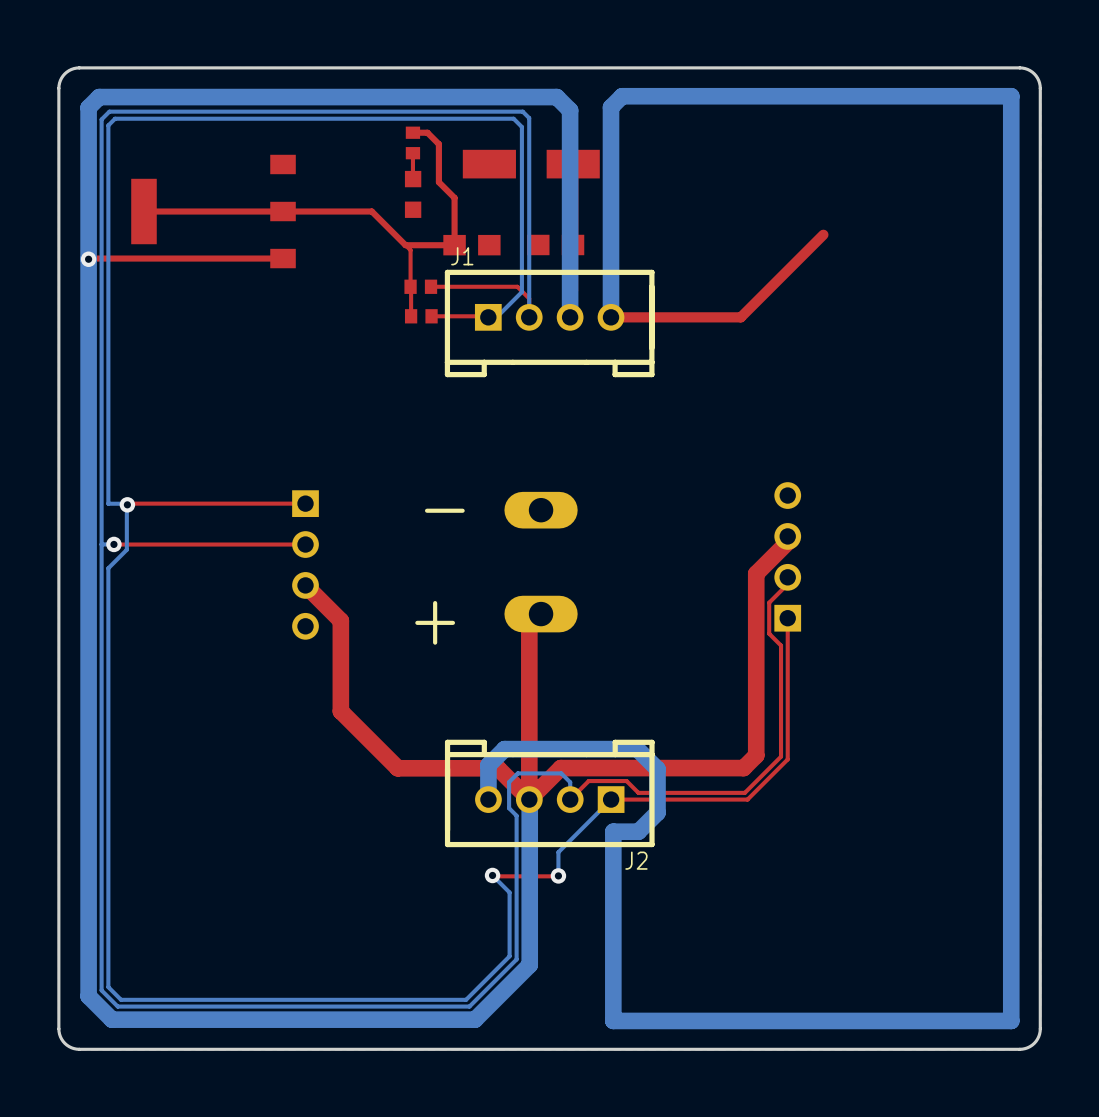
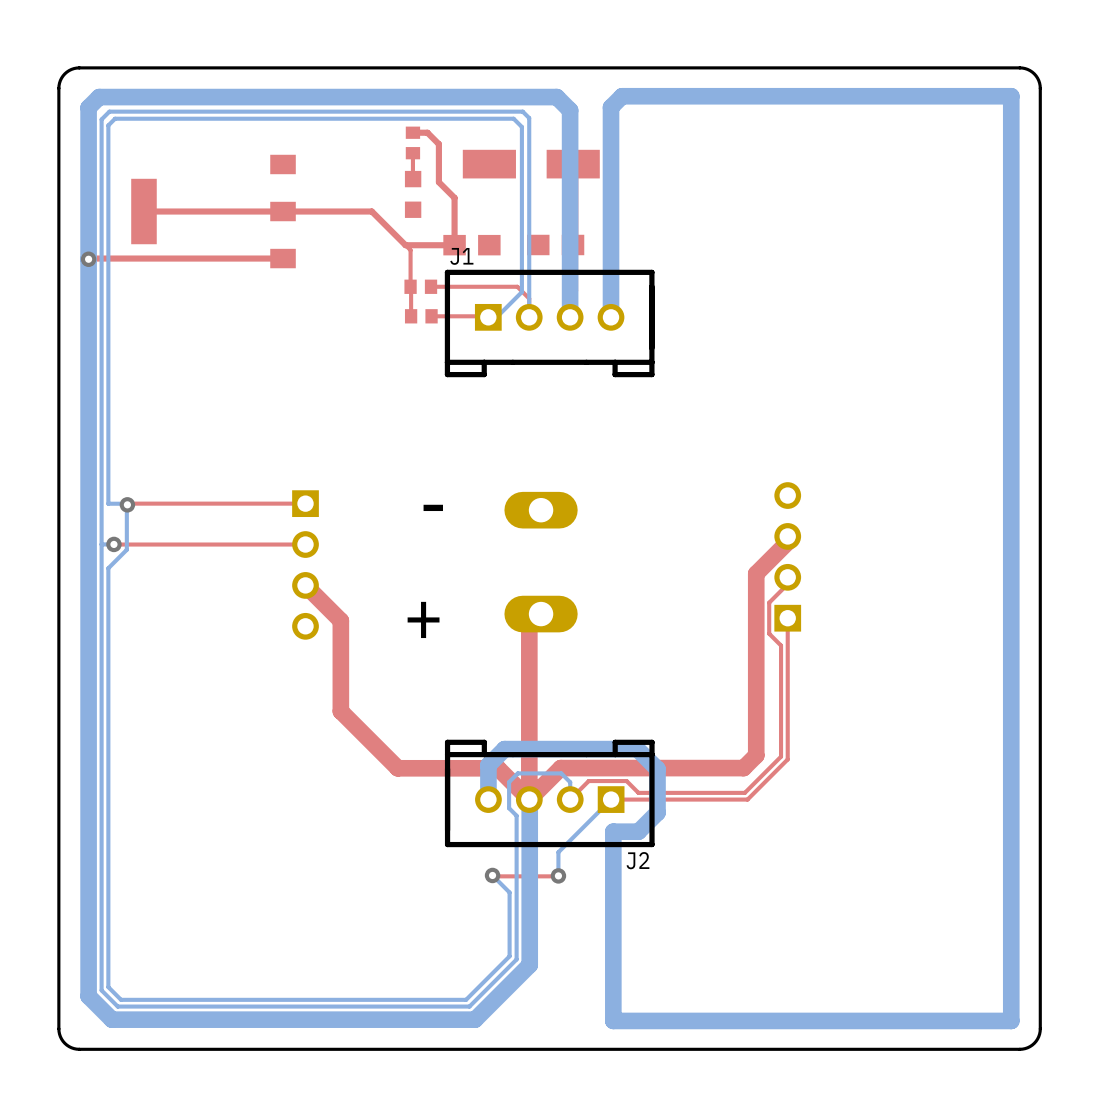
top track: (823, 234) (740, 317) (611, 317) -> none

